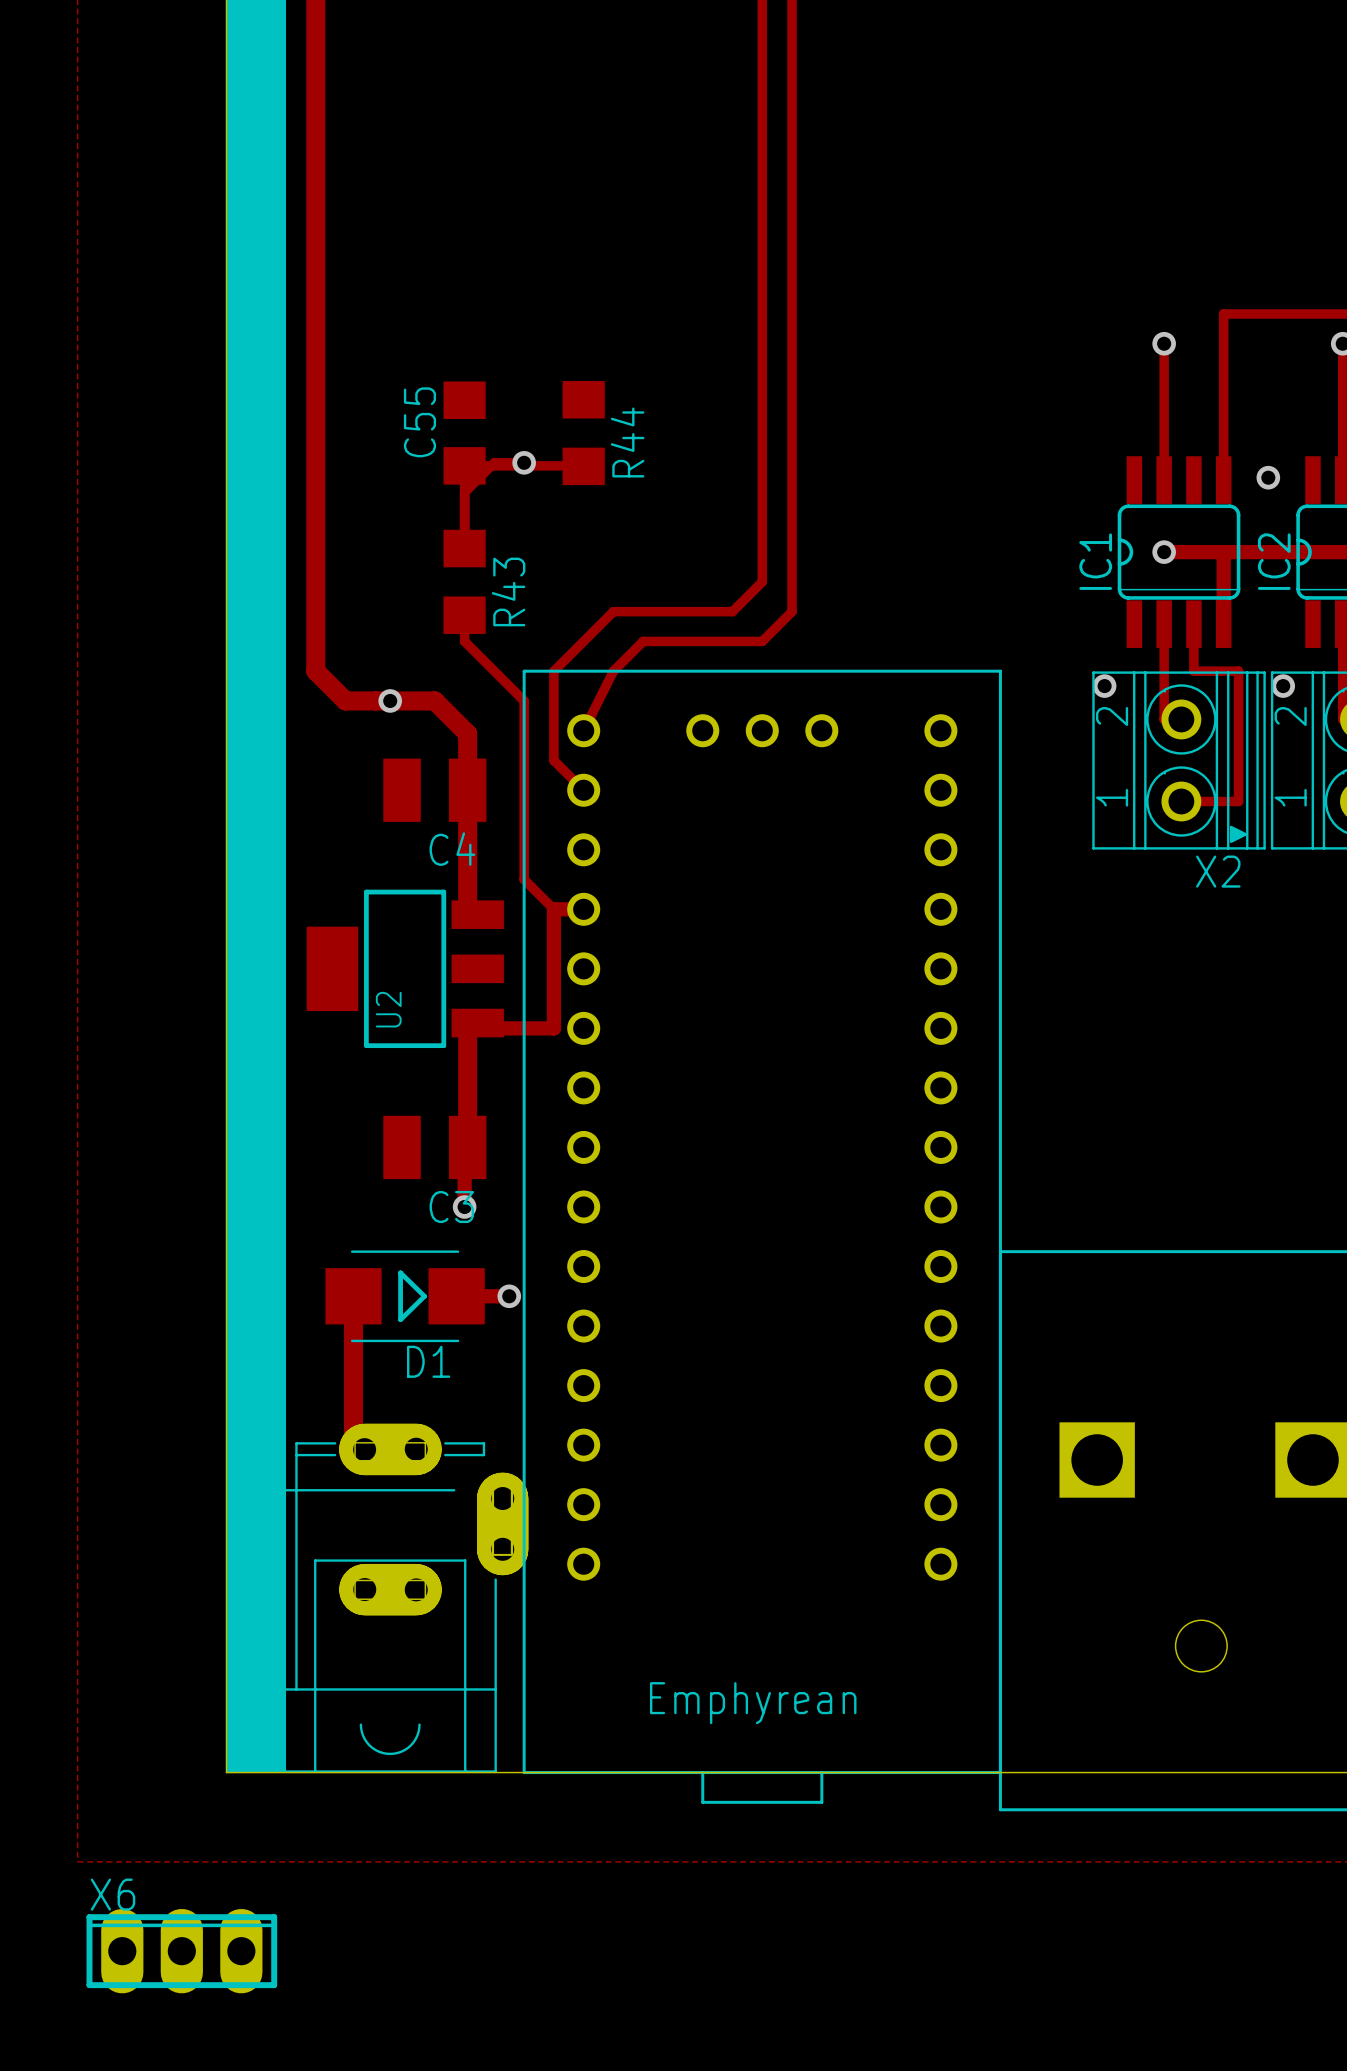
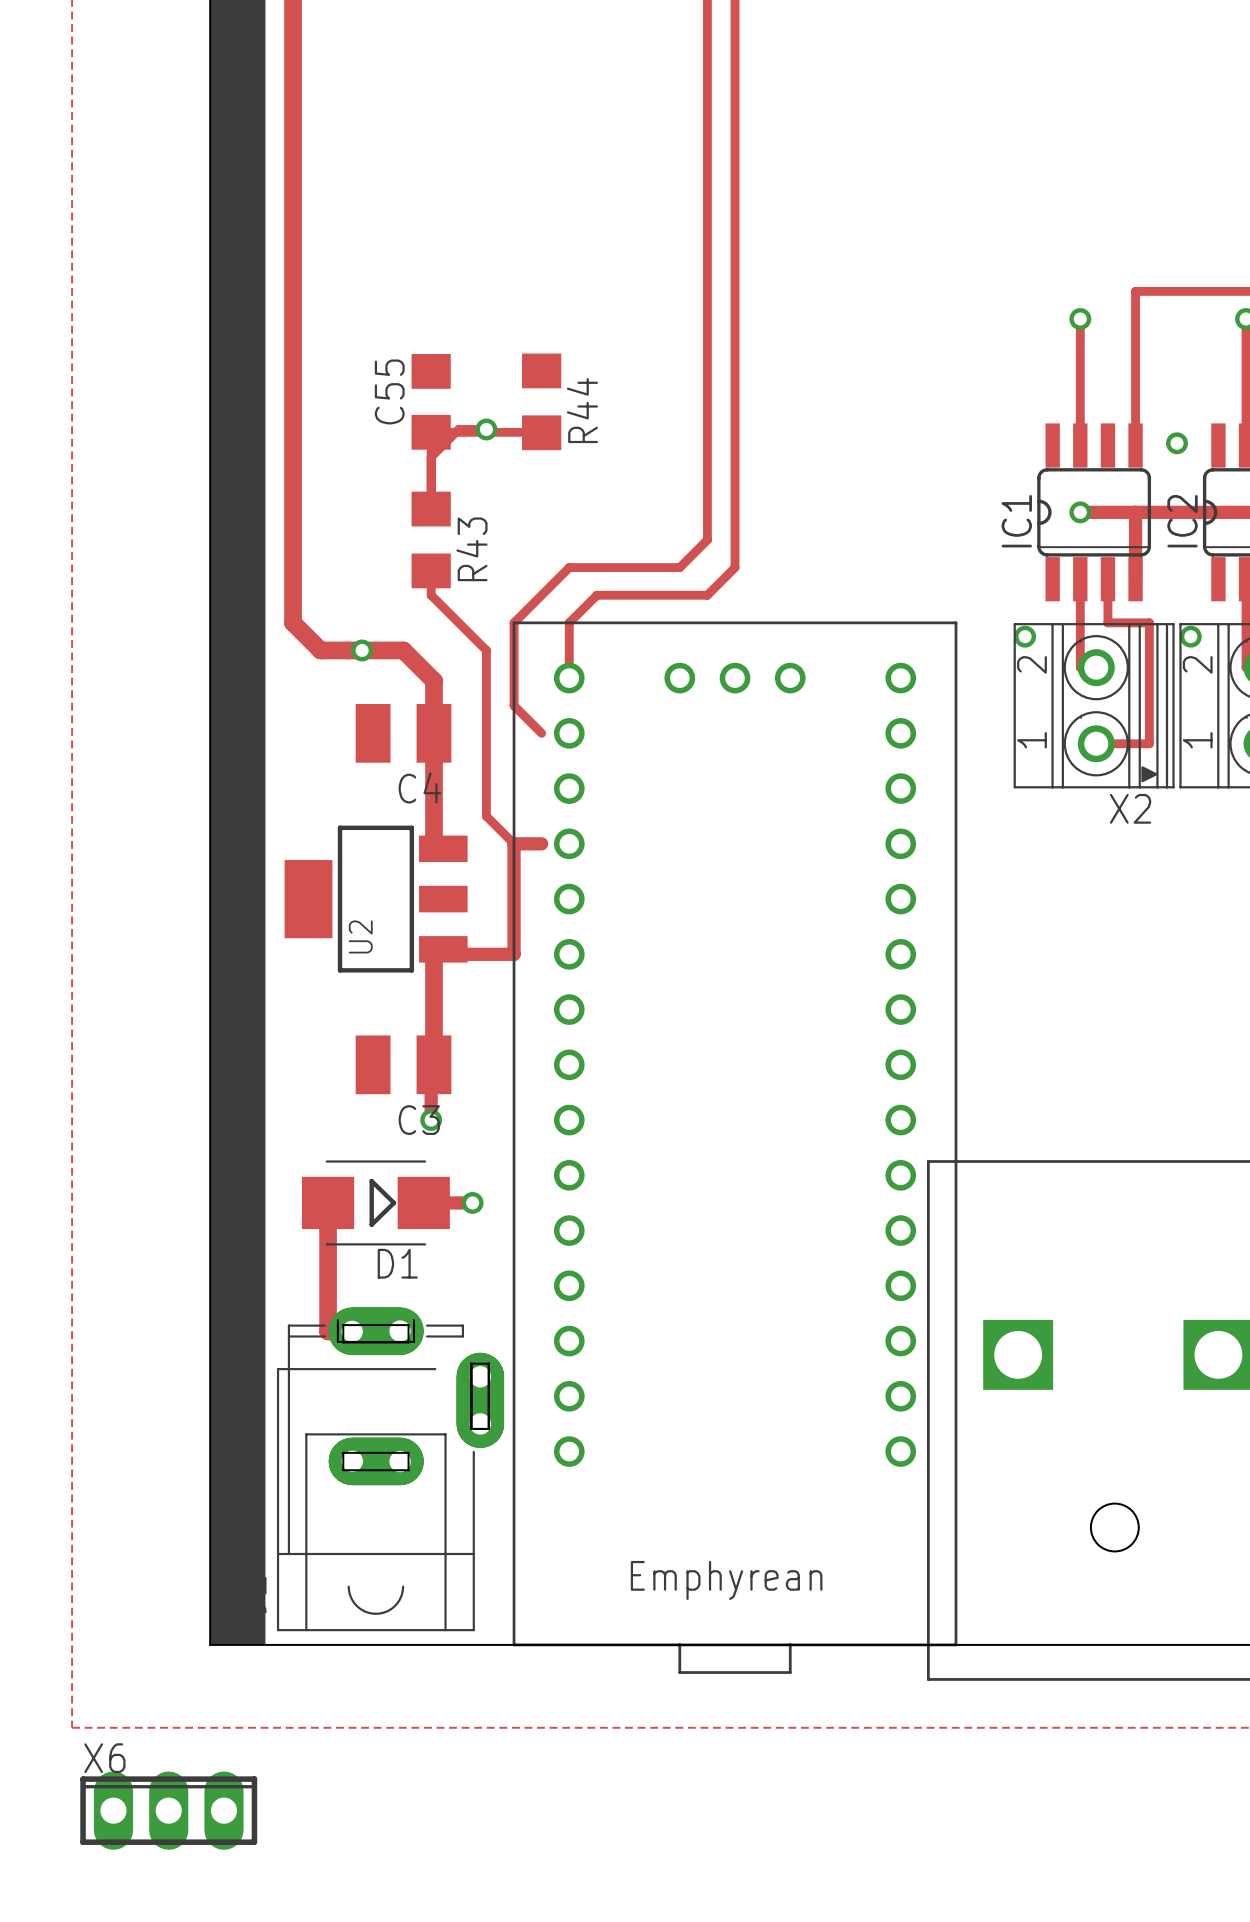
track: (613, 671) (583, 730) -> (569, 622) (569, 678)
part position: (762, 1236) -> (735, 1147)
part position: (405, 1598) -> (390, 1469)

